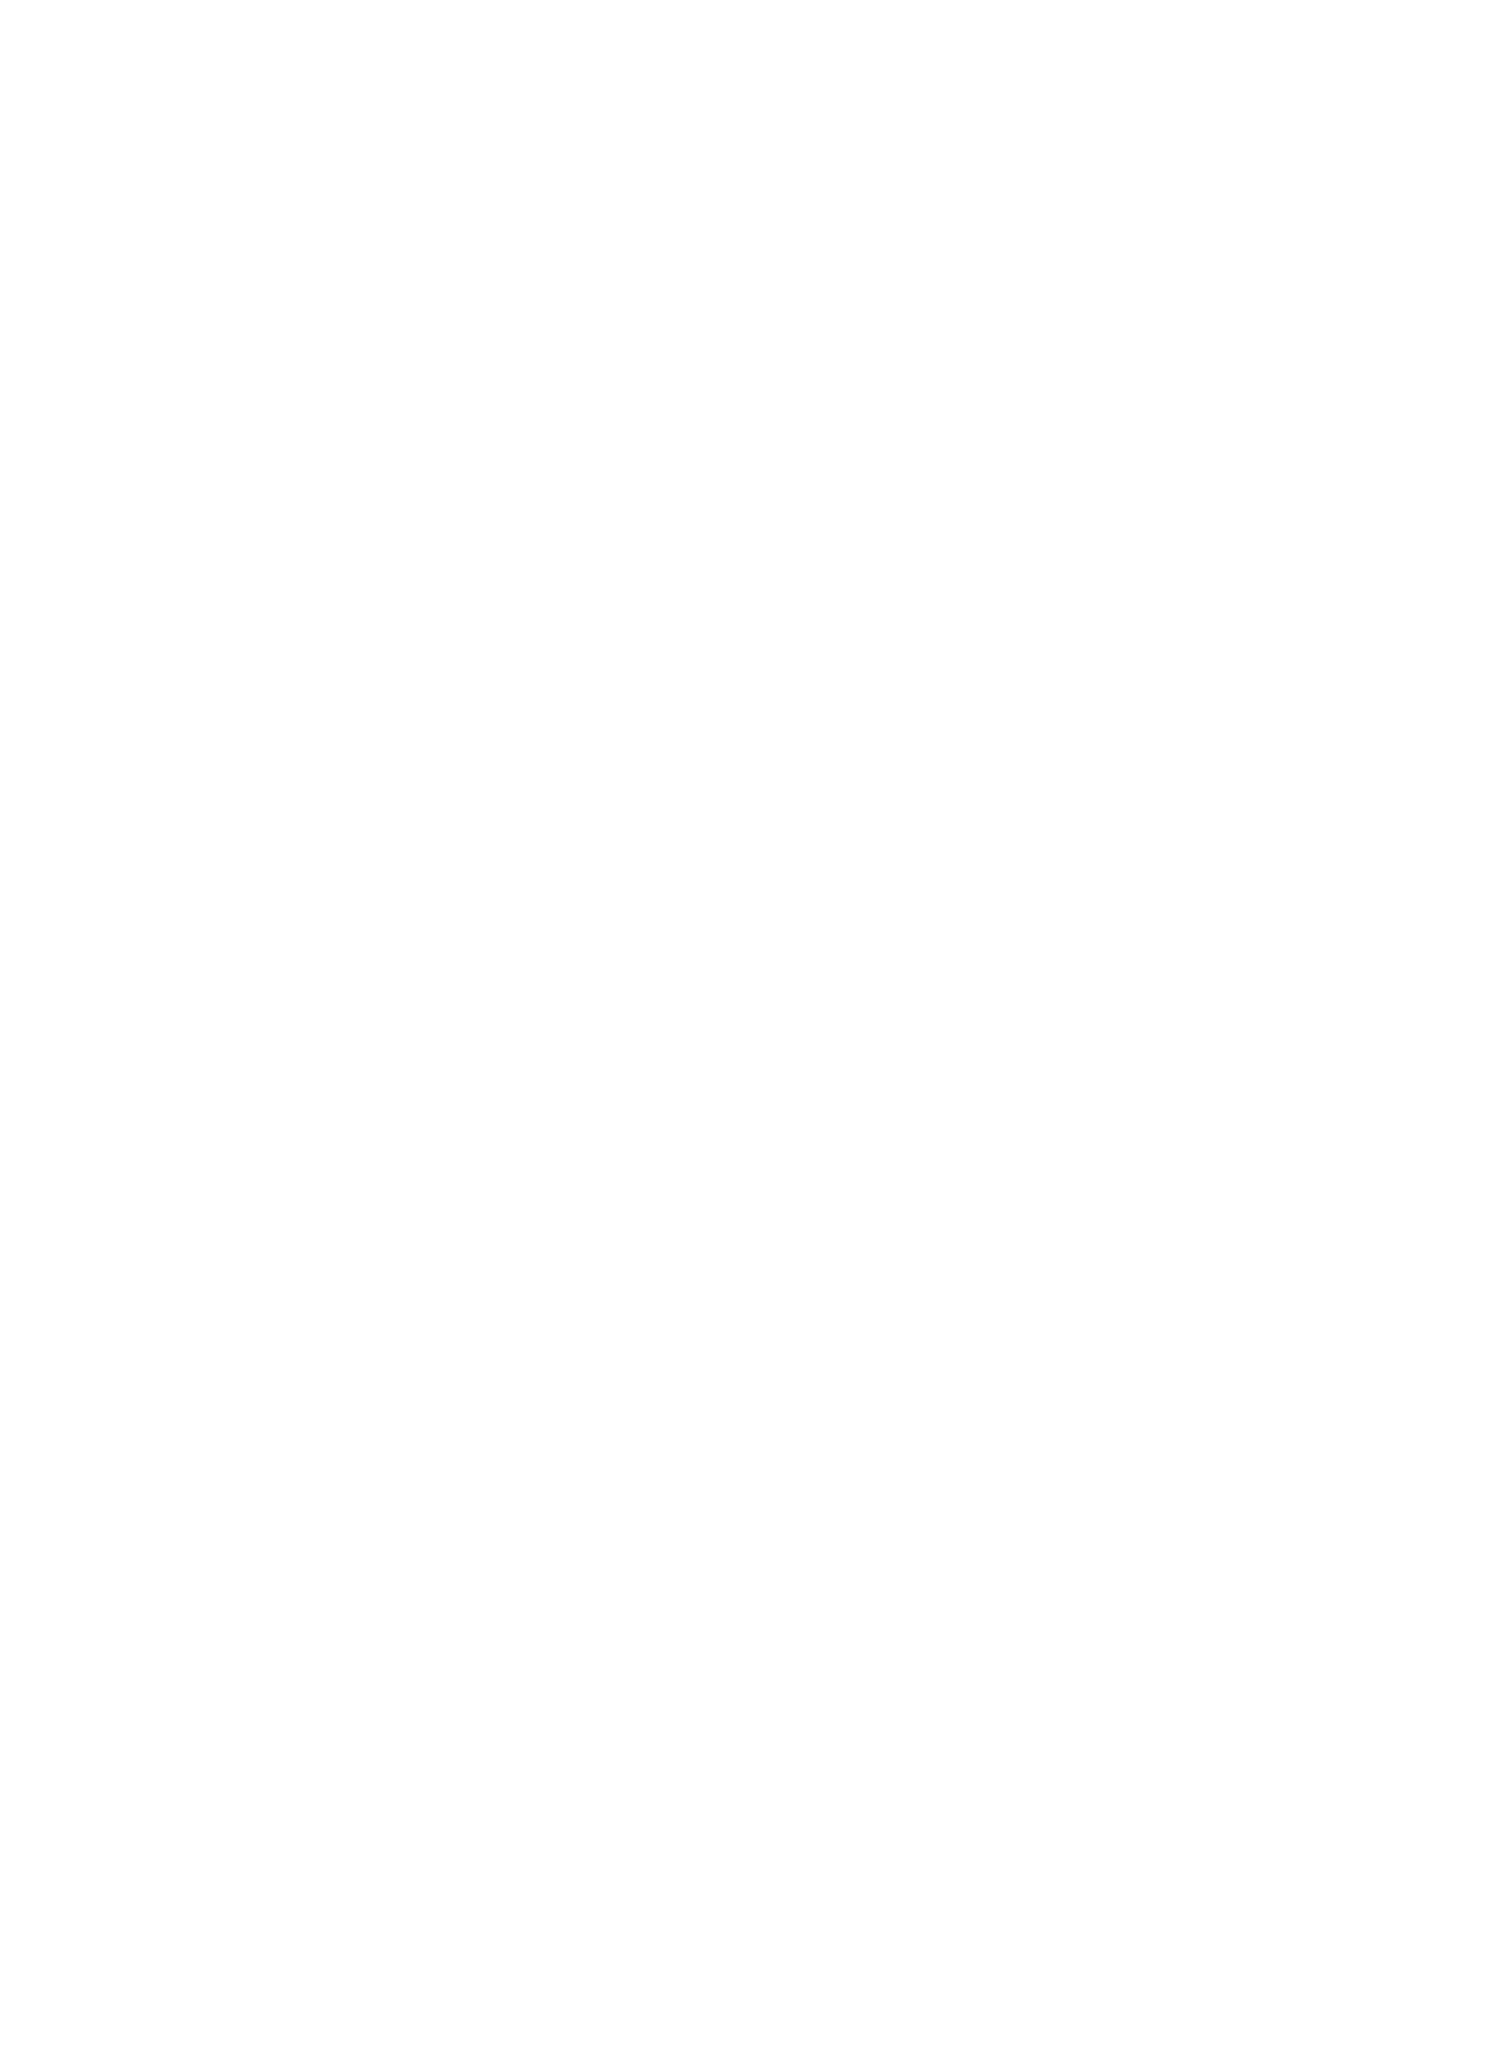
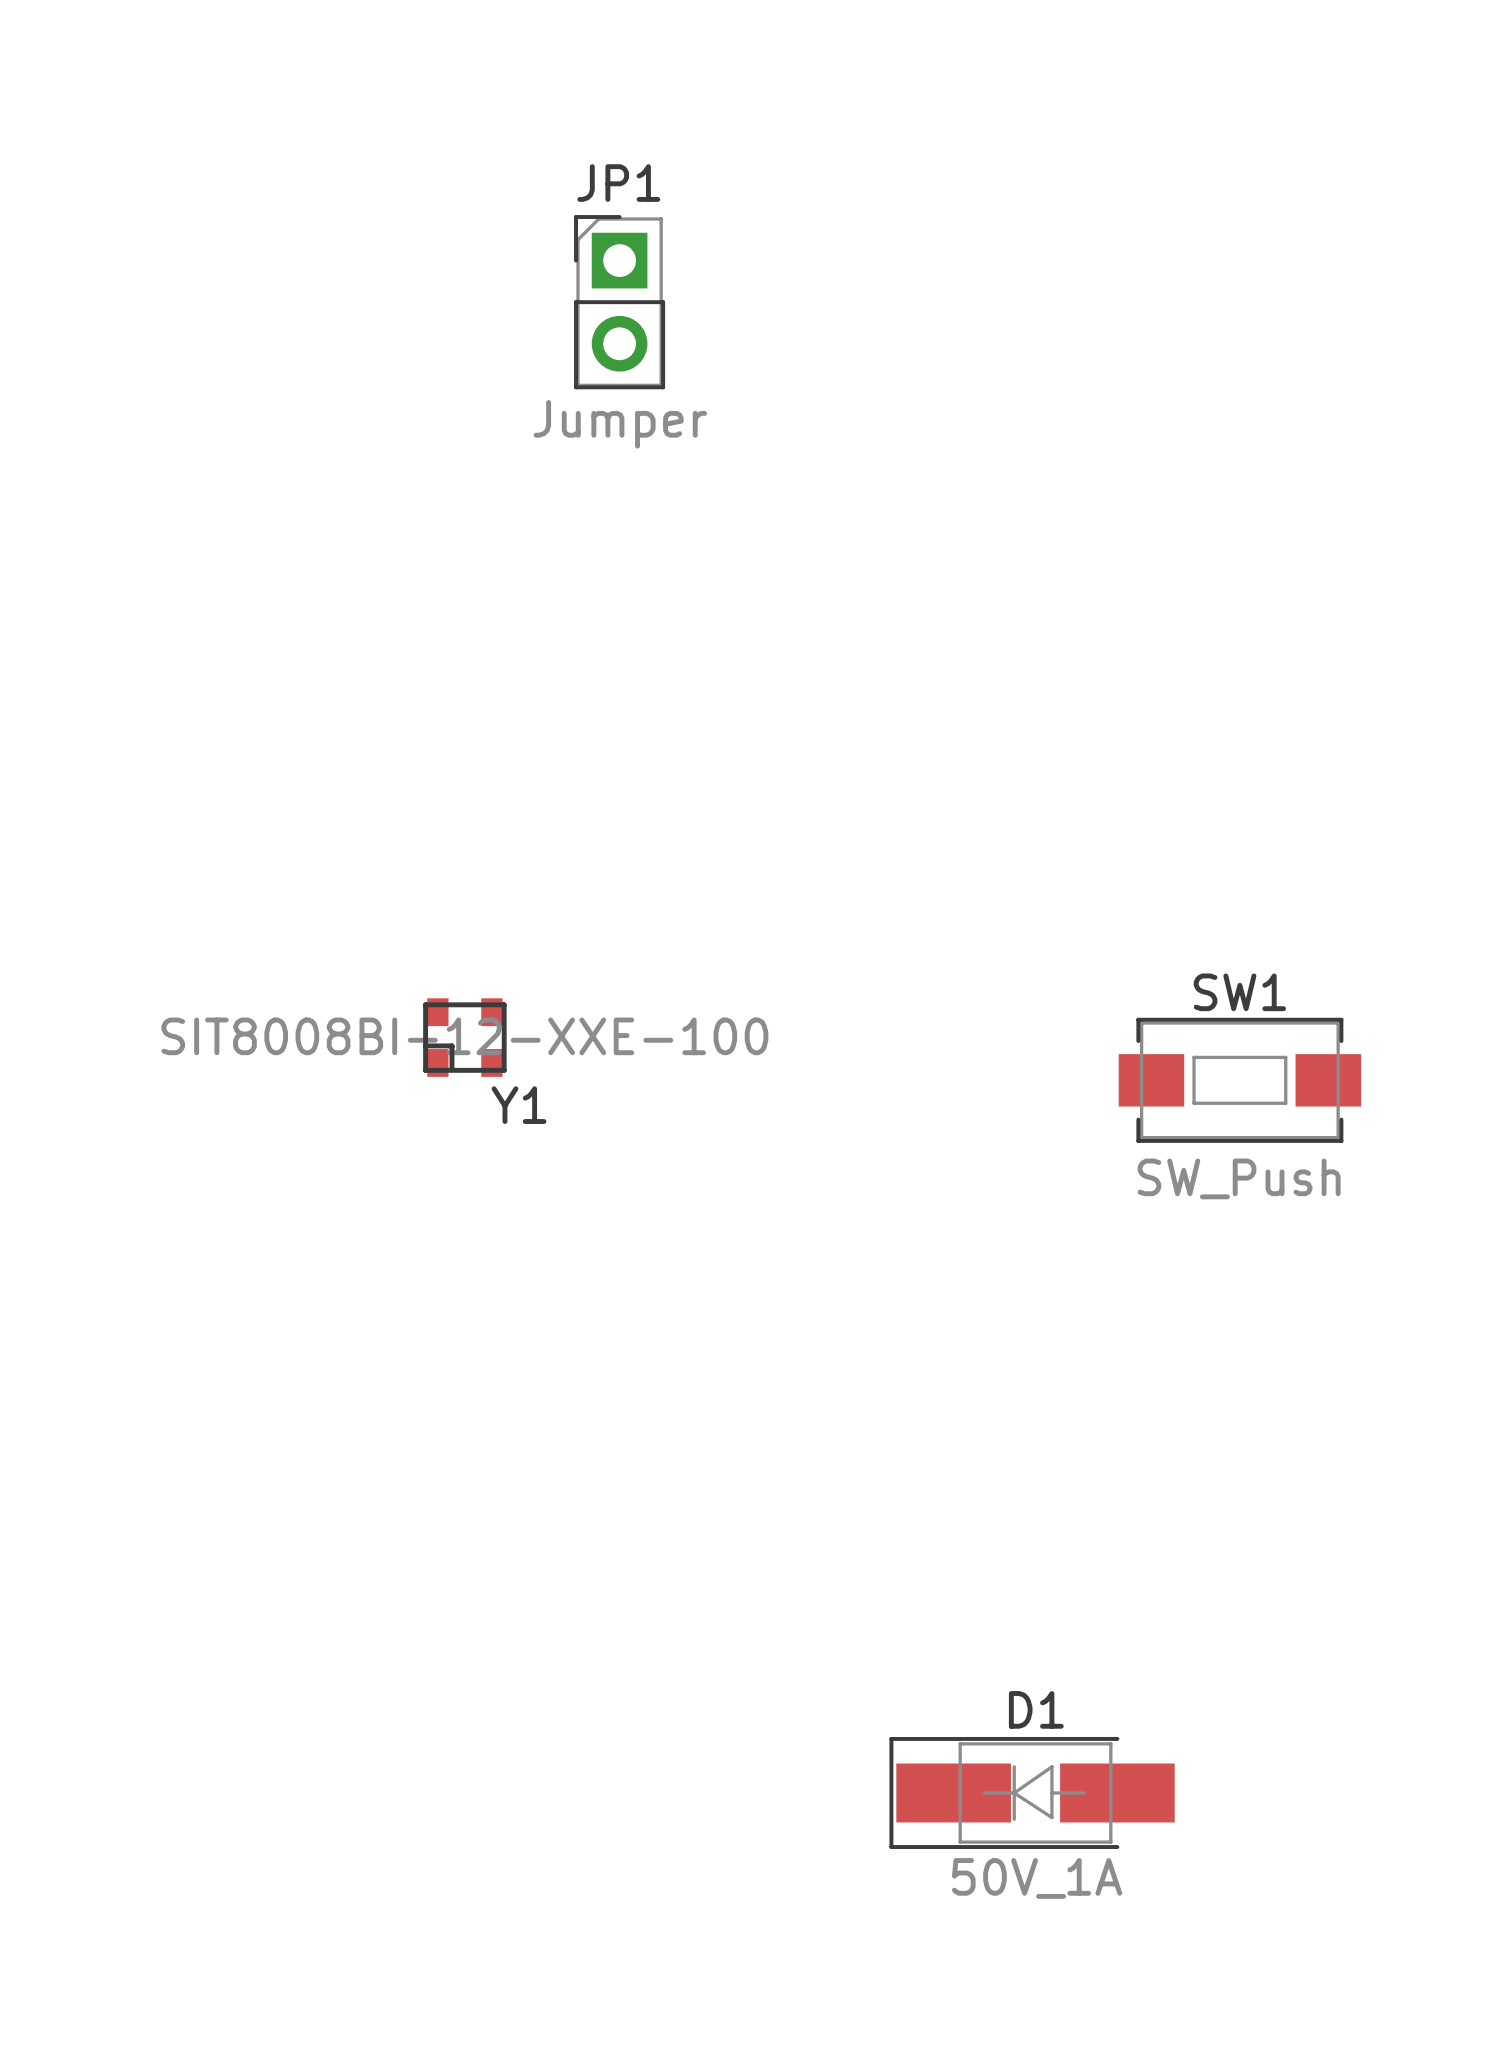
JP1: none -> Jumper (619, 302)
Y1: none -> SIT8008BI-12-XXE-100 (464, 1037)
SW1: none -> SW_Push (1239, 1080)
D1: none -> 50V_1A (1032, 1792)

